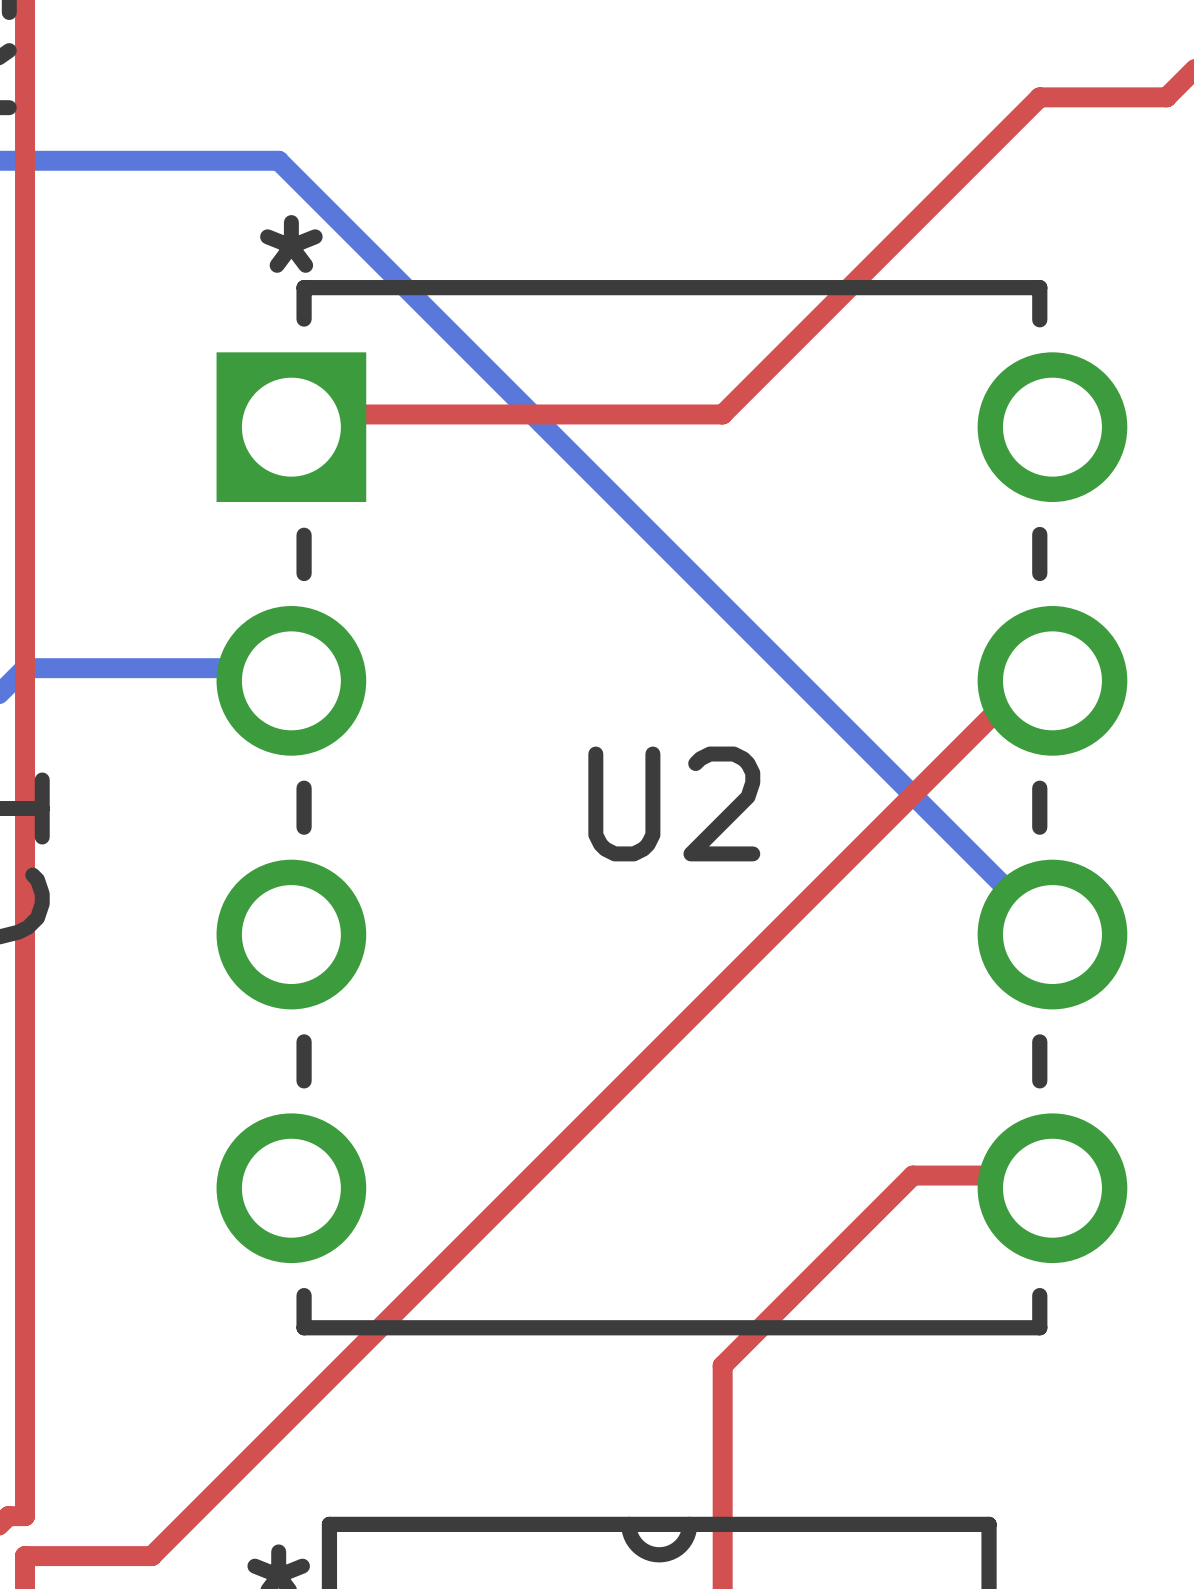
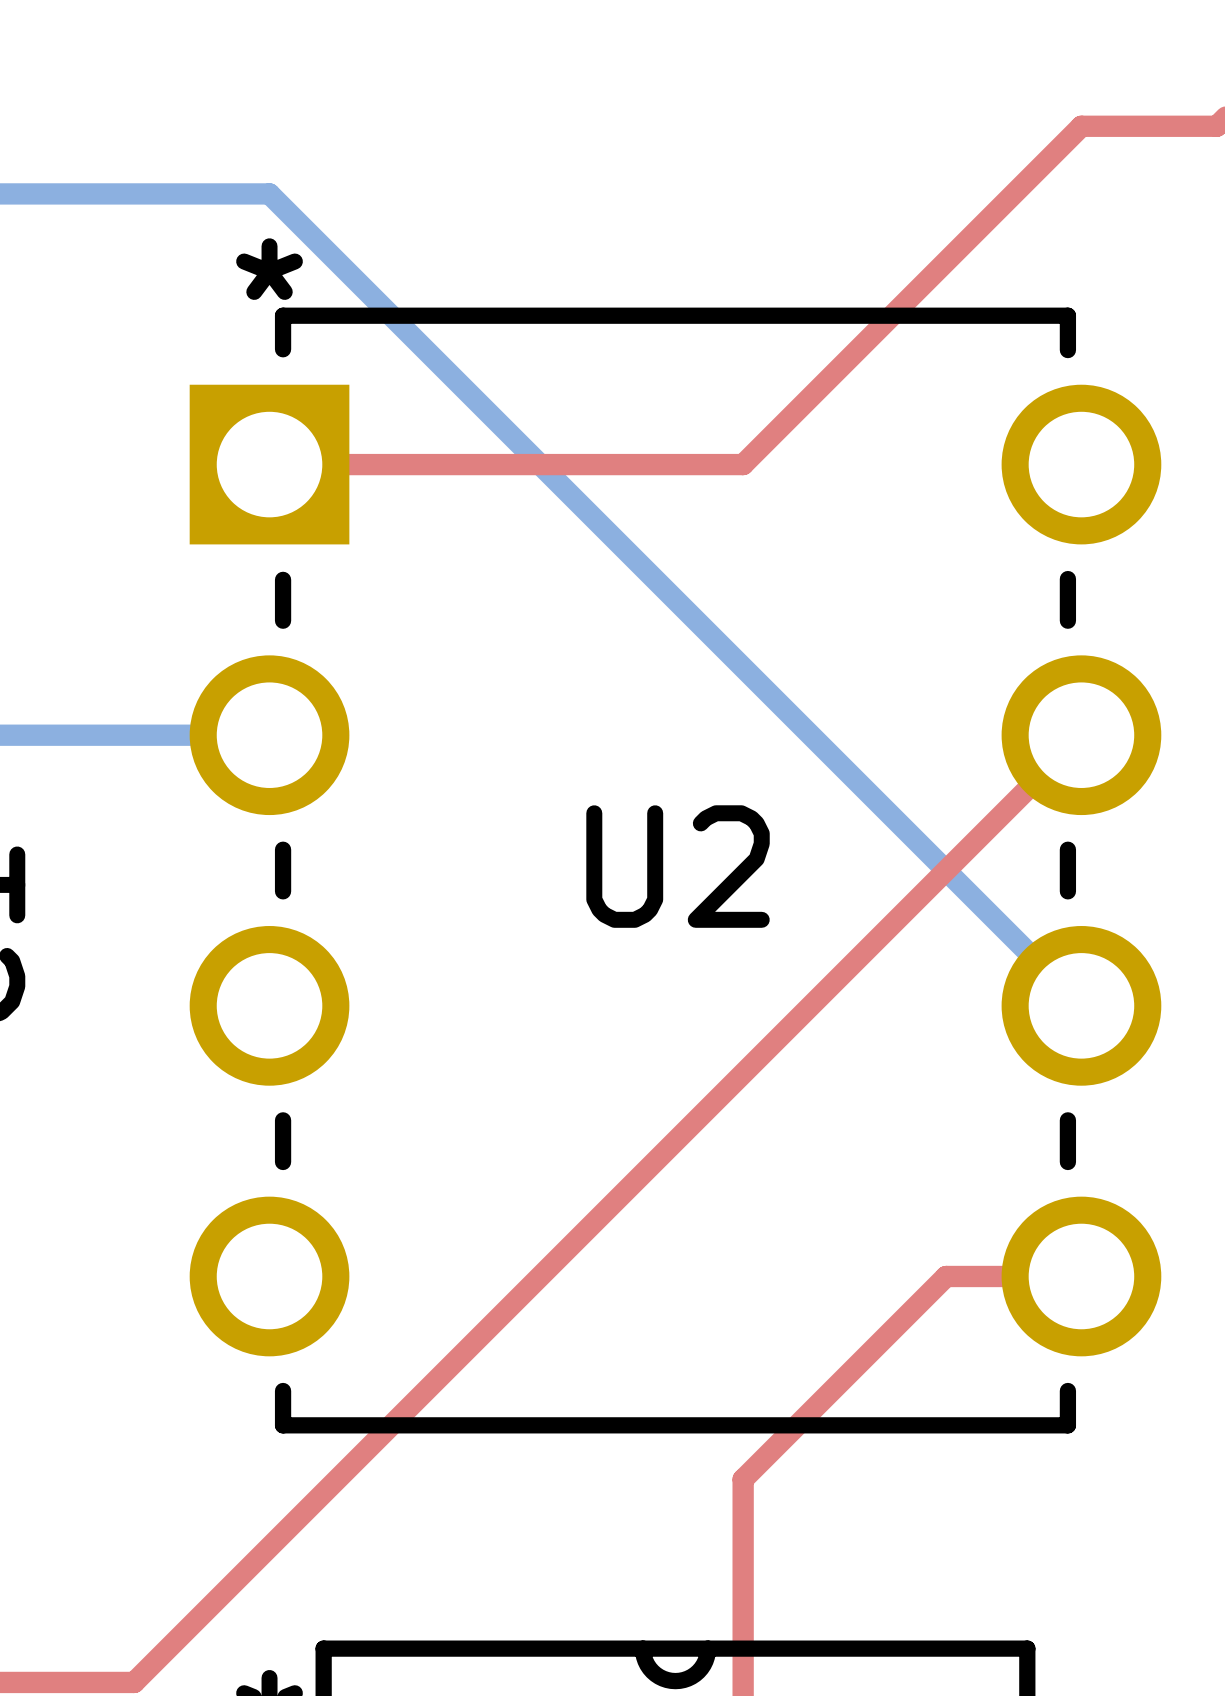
U2 position: (671, 807) -> (675, 870)

